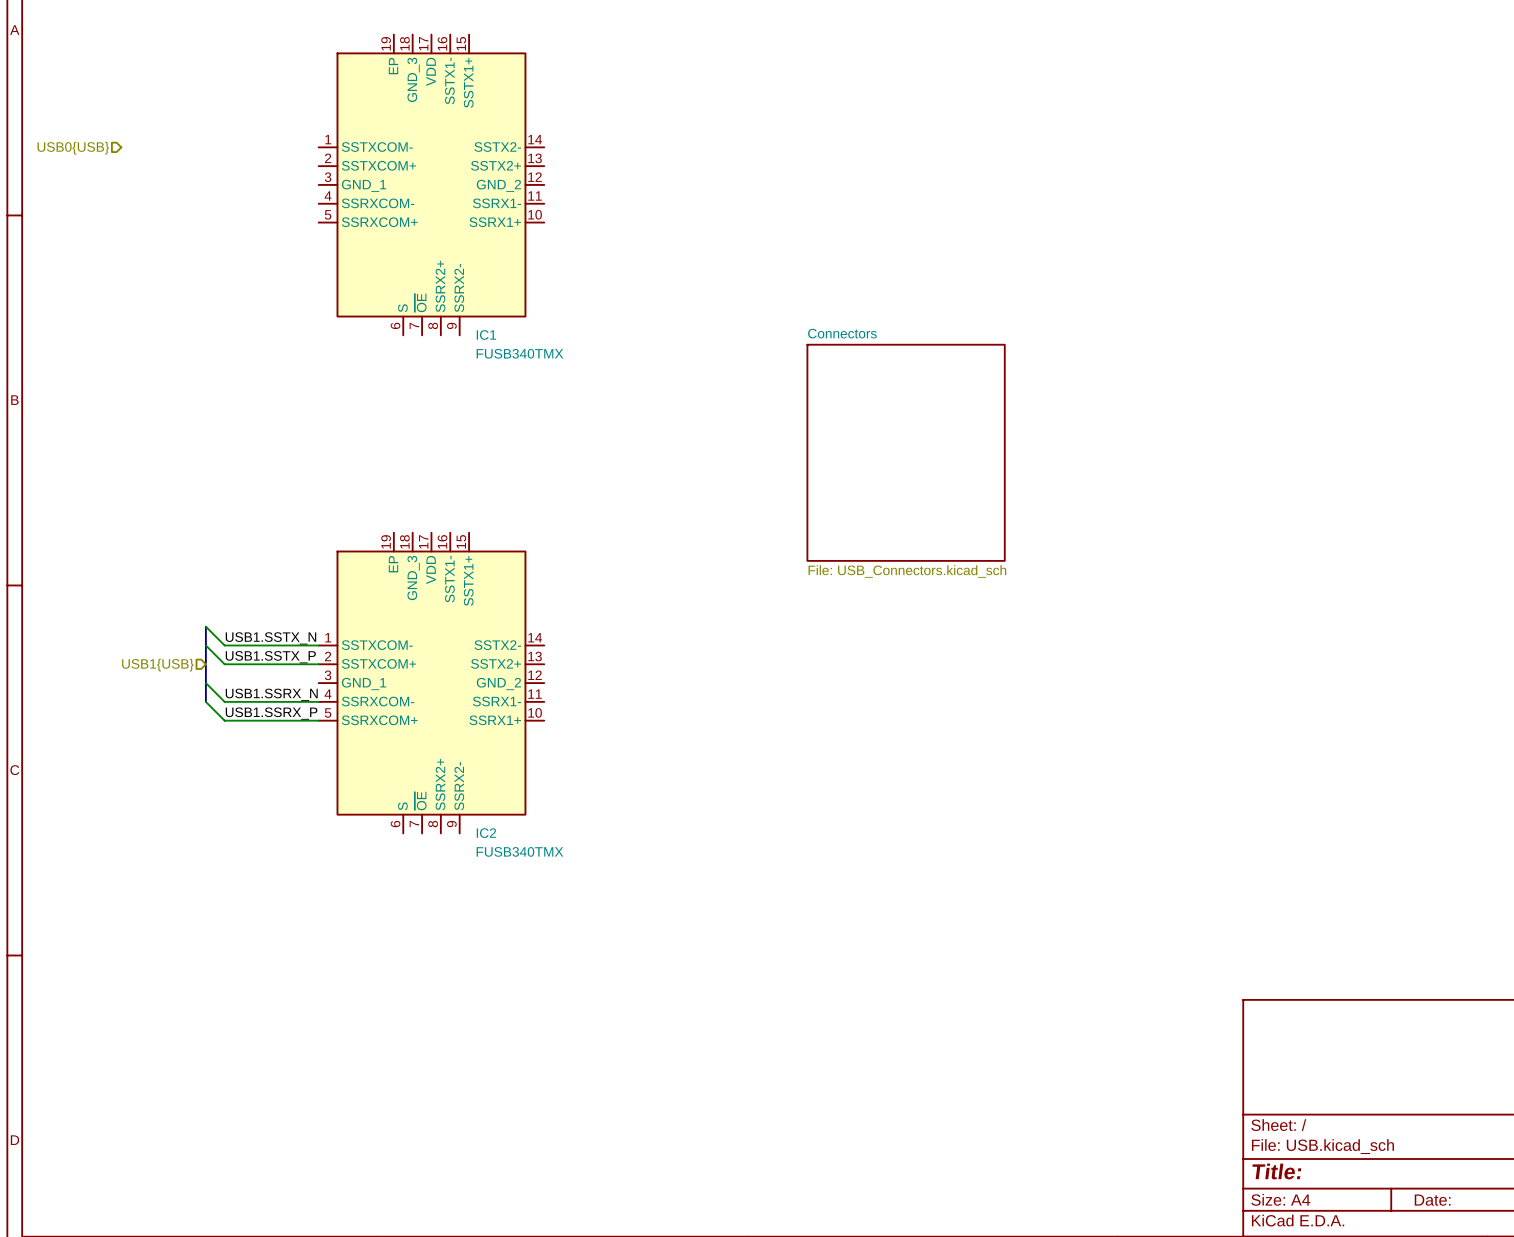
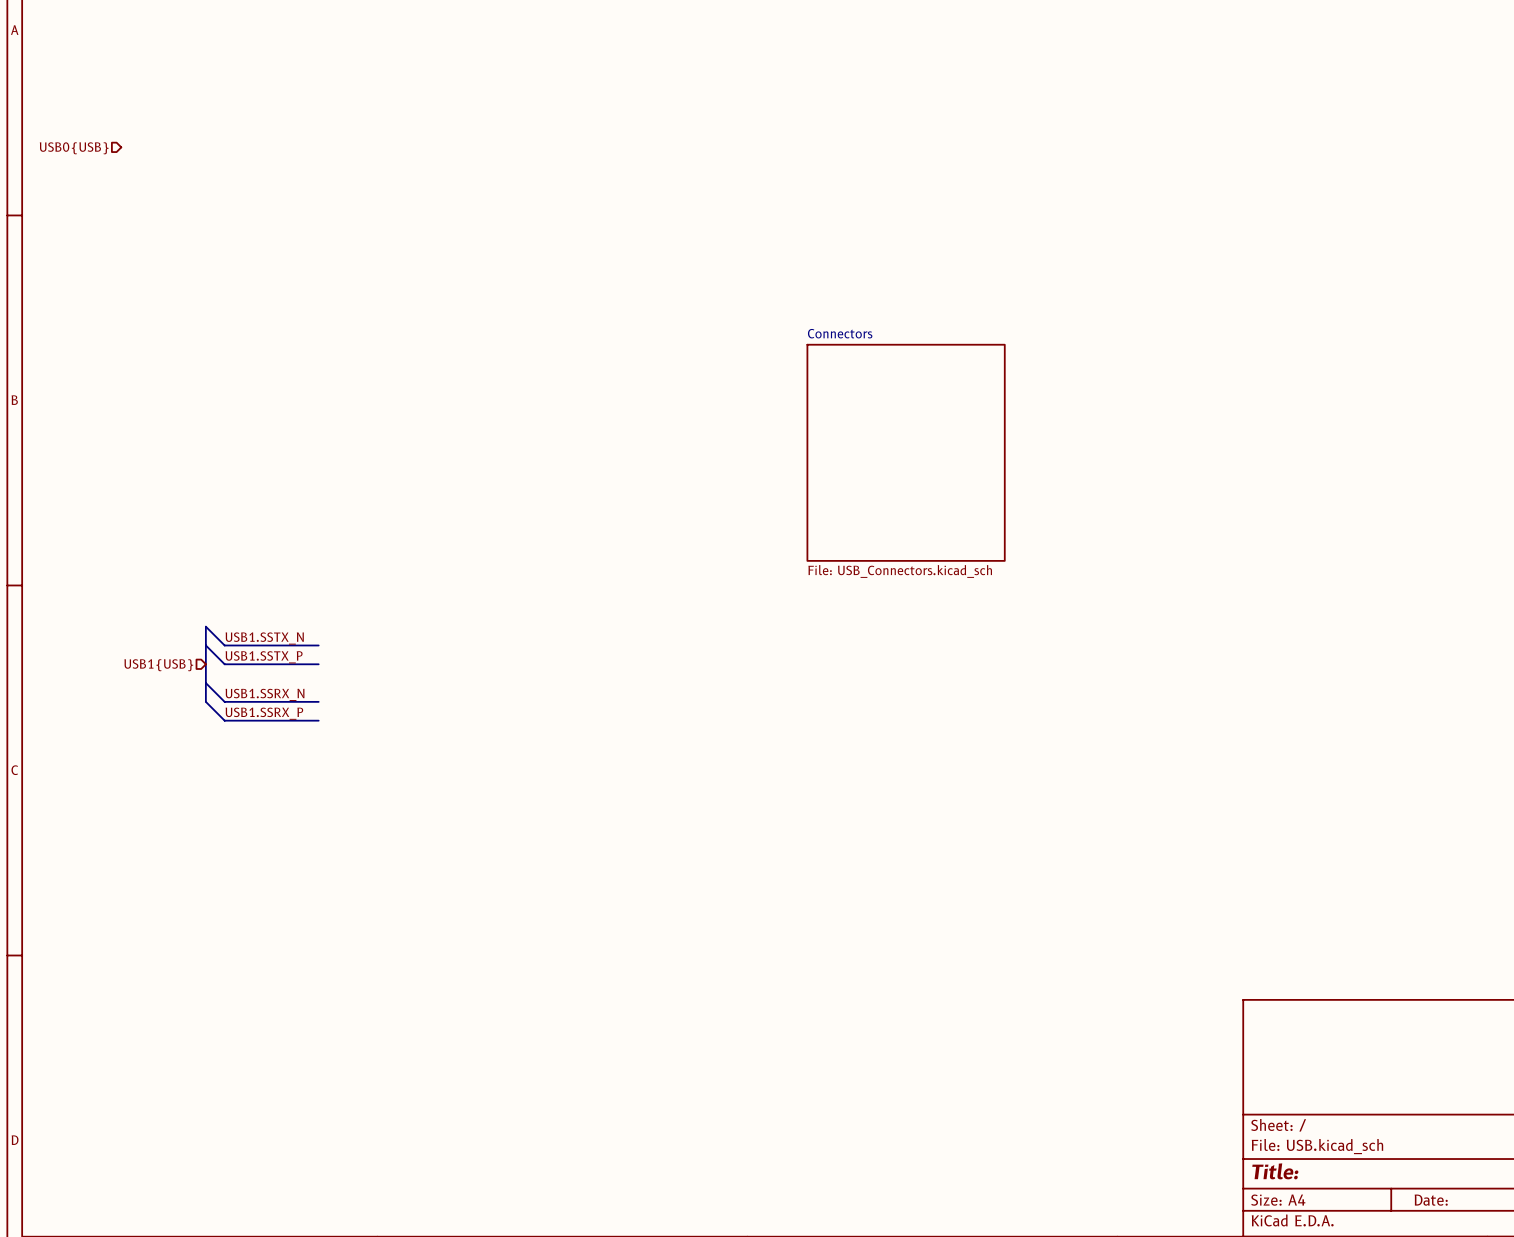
IC1: FUSB340TMX (431, 184) -> none
IC2: FUSB340TMX (431, 683) -> none

